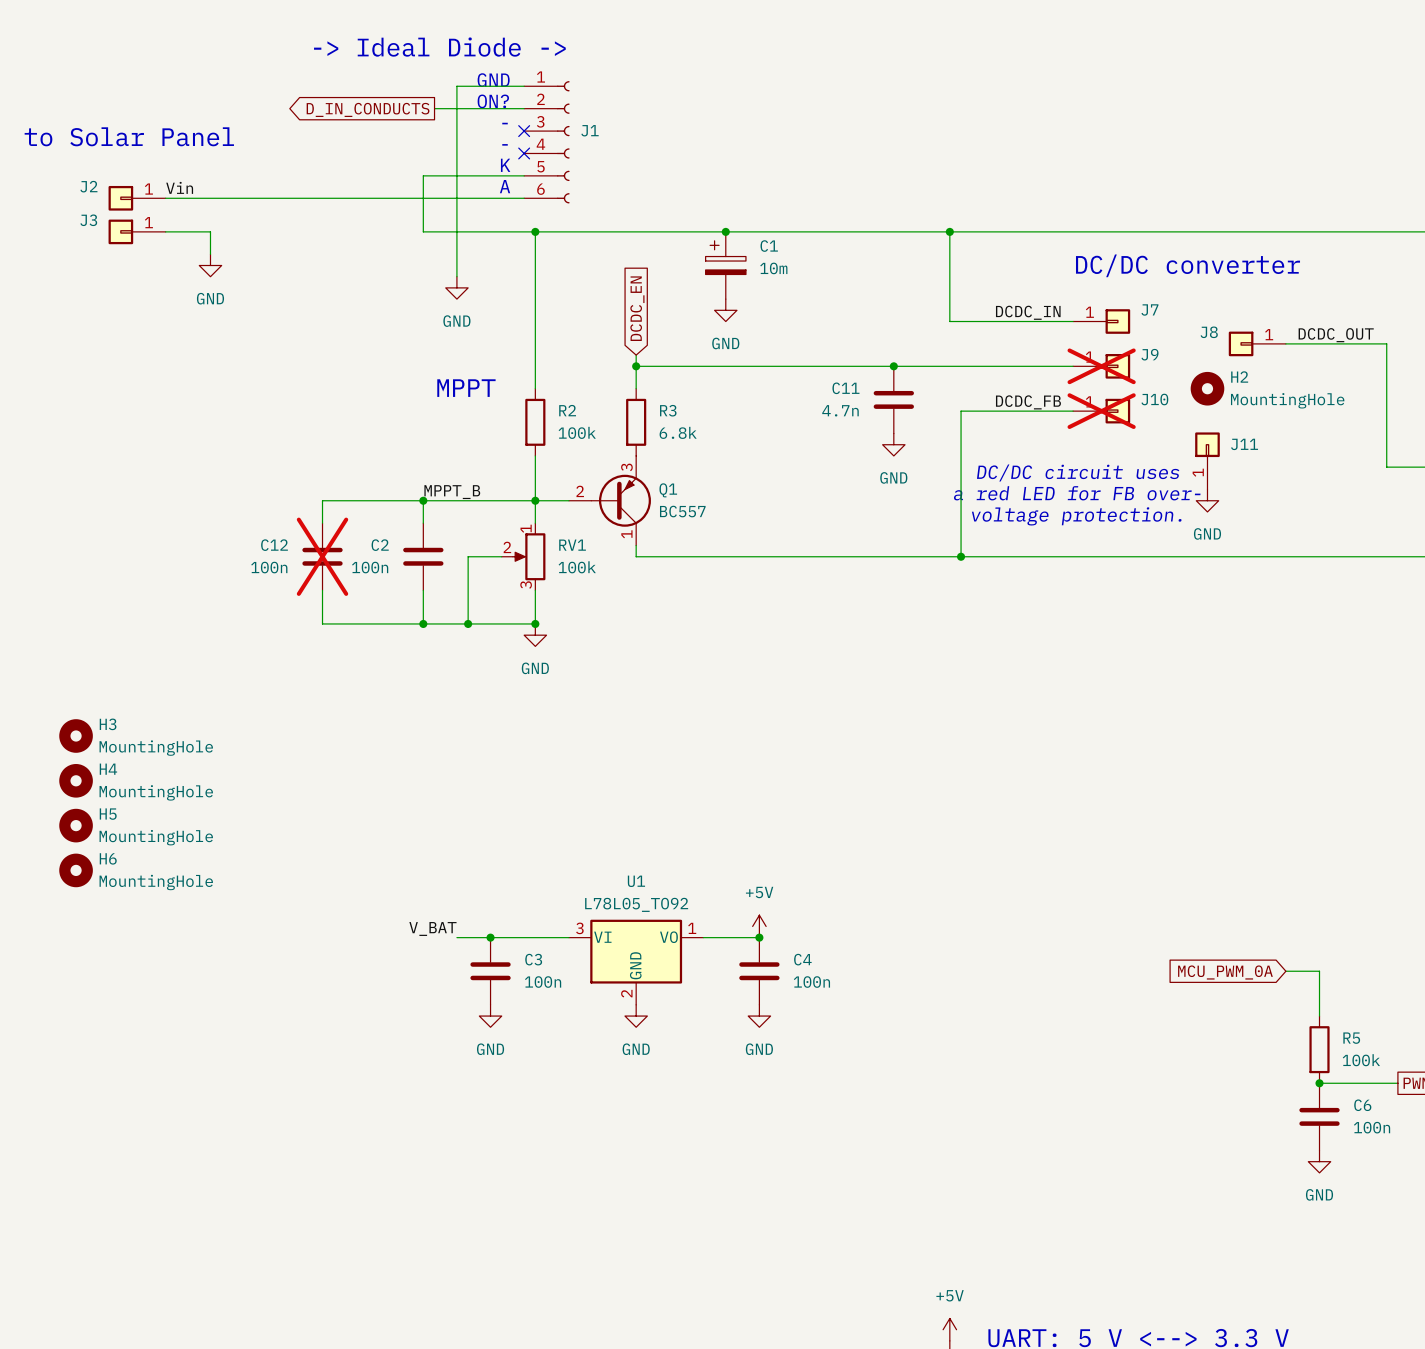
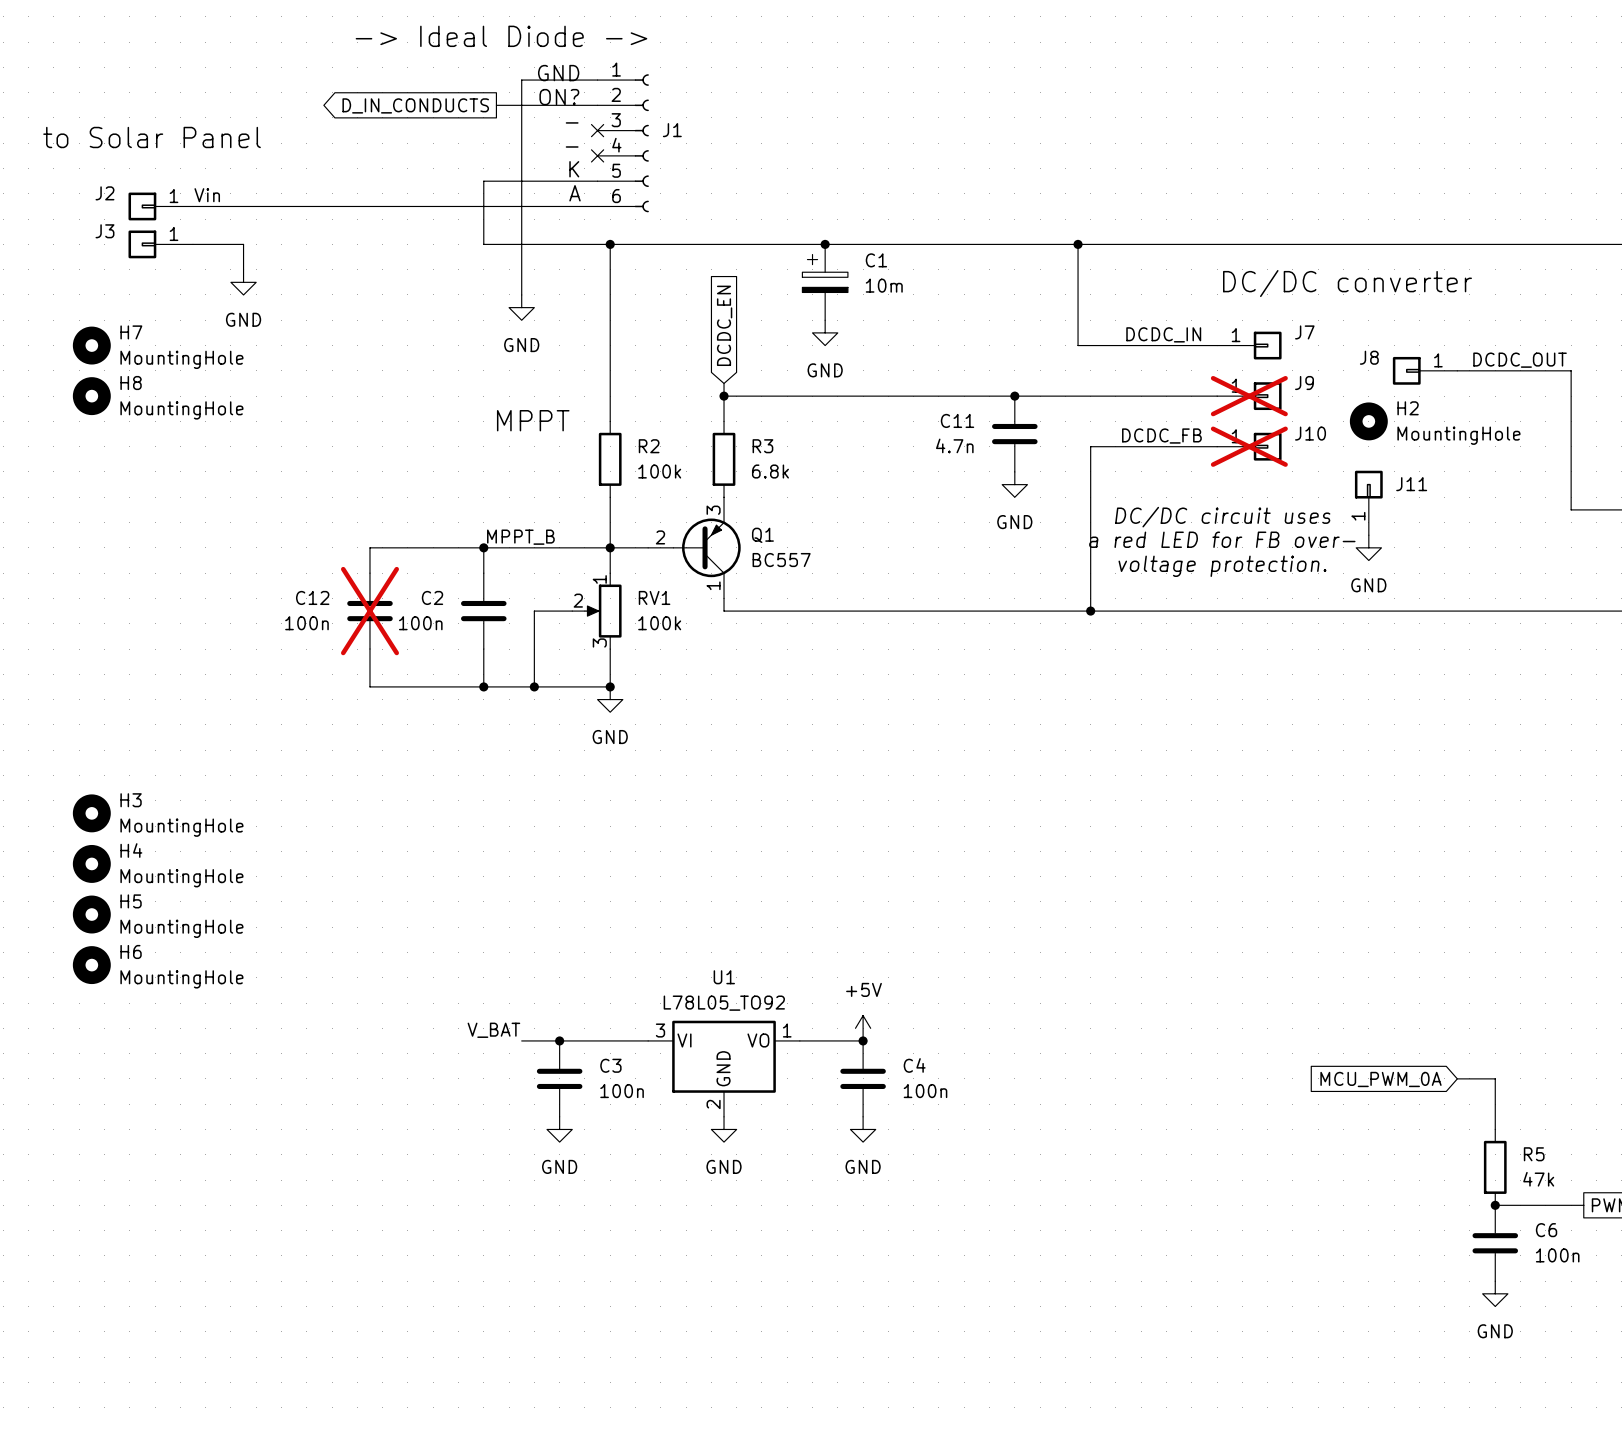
H7: none -> MountingHole (91, 345)
H8: none -> MountingHole (91, 396)
R5 value: 100k (1361, 1060) -> 47k (1538, 1179)

